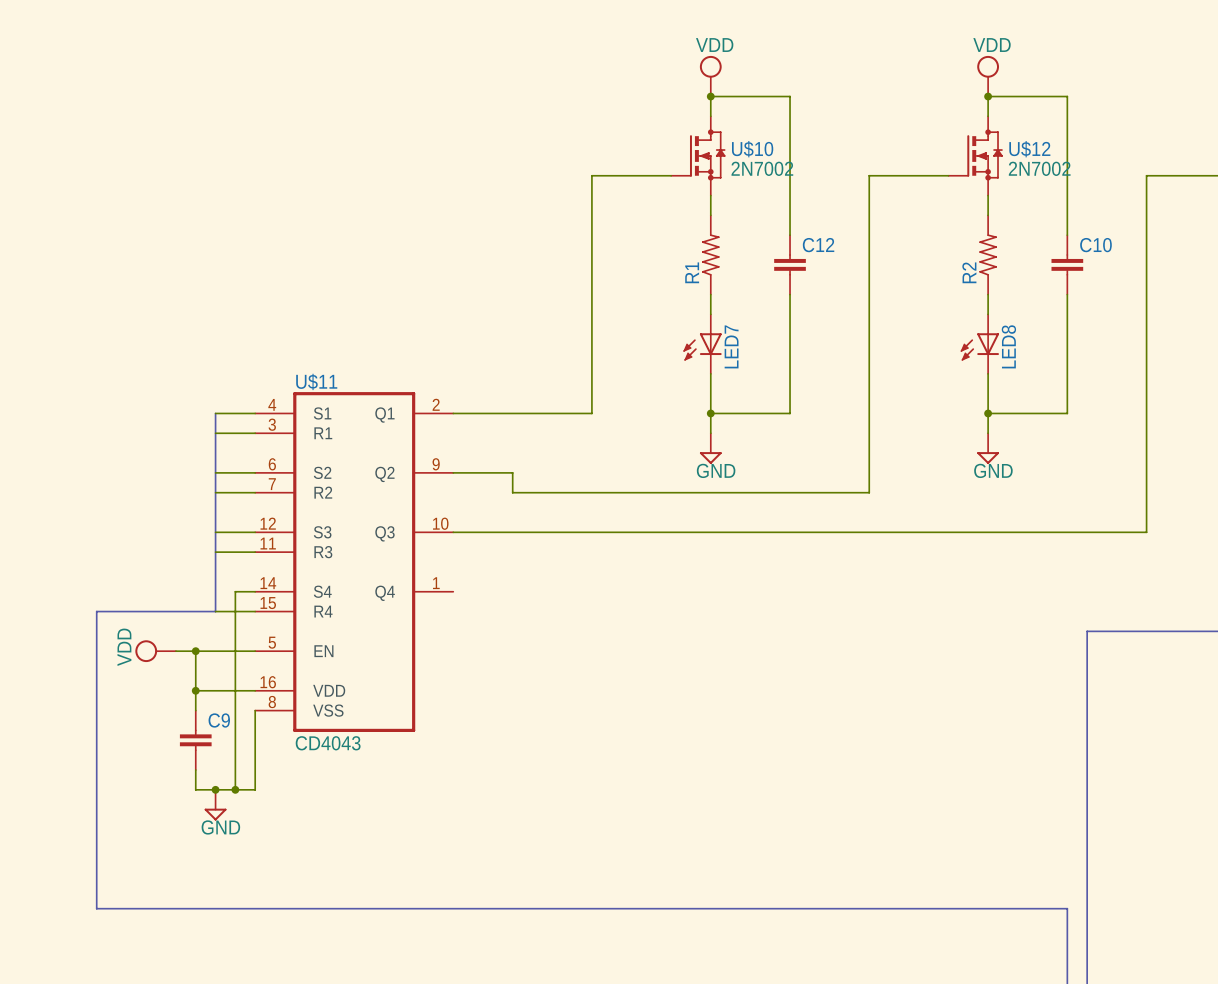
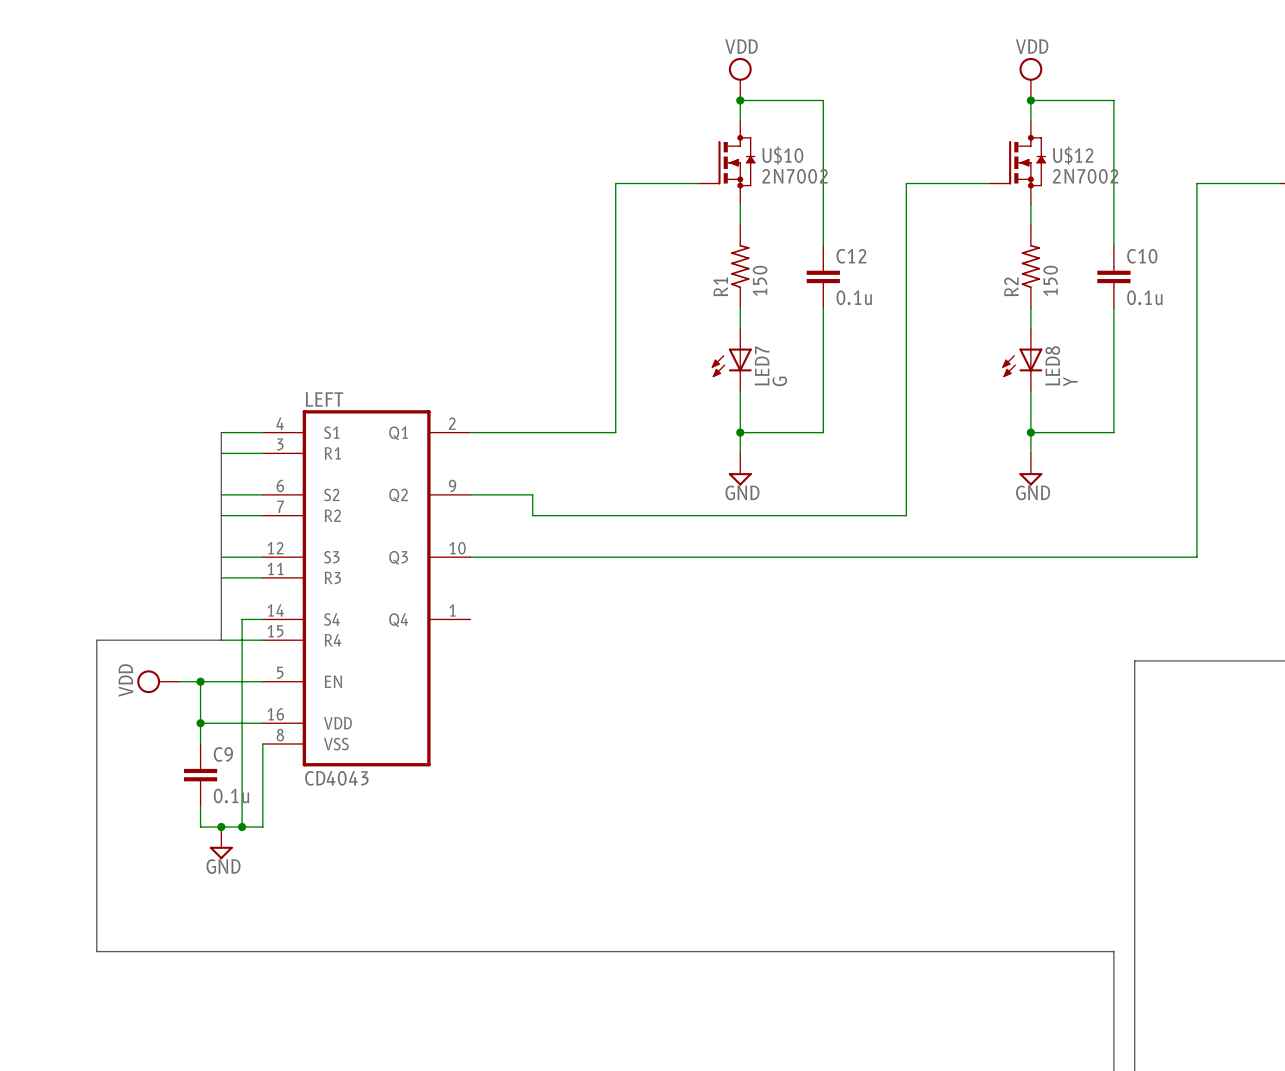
R1 value: none -> 150 (760, 280)
R2 value: none -> 150 (1050, 280)
C12 value: none -> 0.1u (854, 297)
C10 value: none -> 0.1u (1144, 297)
LED7 value: none -> G (779, 381)
LED8 value: none -> Y (1070, 381)
U$11 name: U$11 (316, 381) -> LEFT (324, 399)
C9 value: none -> 0.1u (231, 795)

